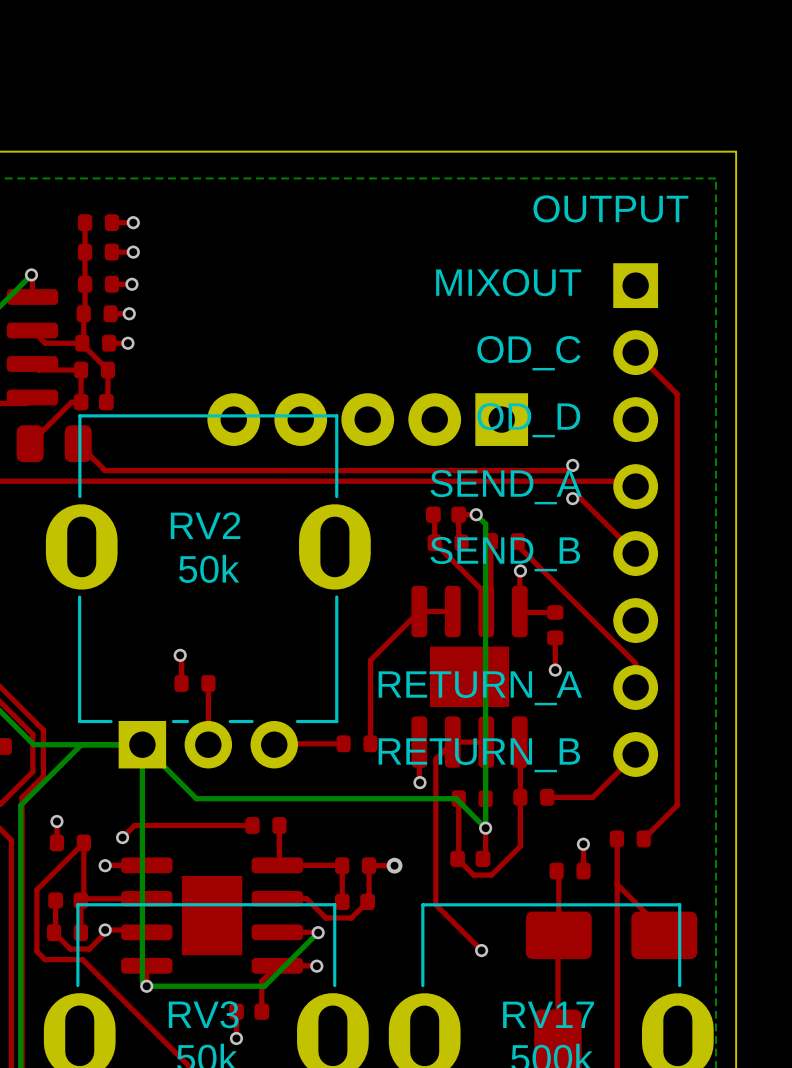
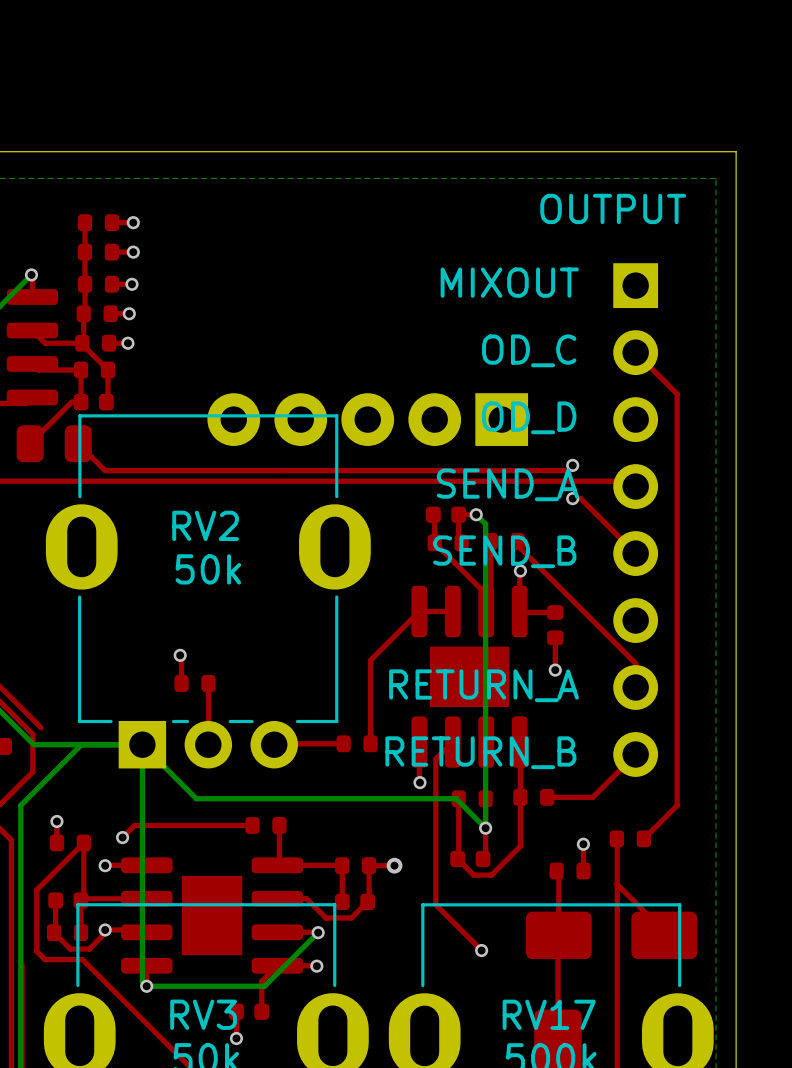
top track: (41, 727) (43, 730) (43, 776) (22, 797) (22, 964) -> none
top track: (486, 742) (452, 742) -> none

